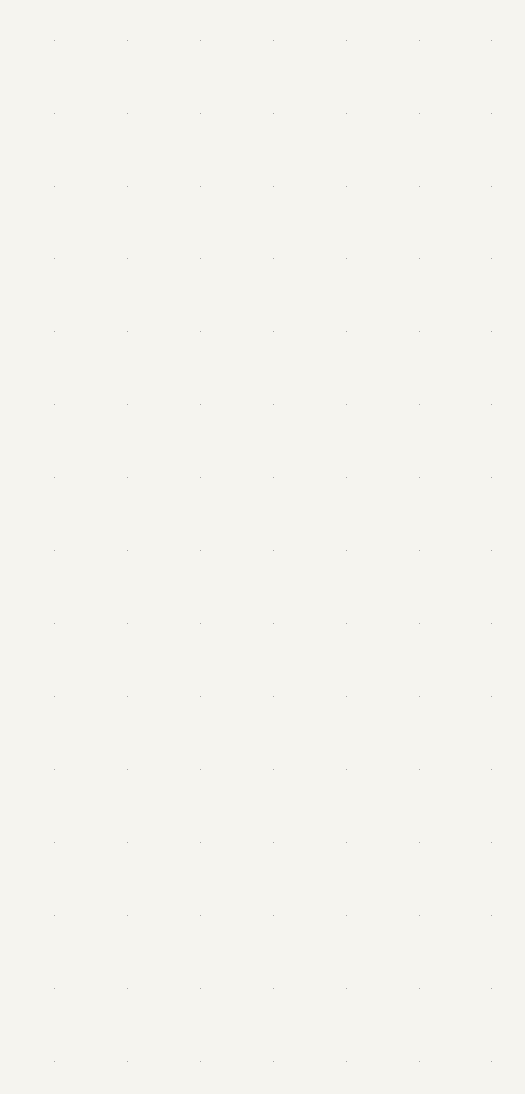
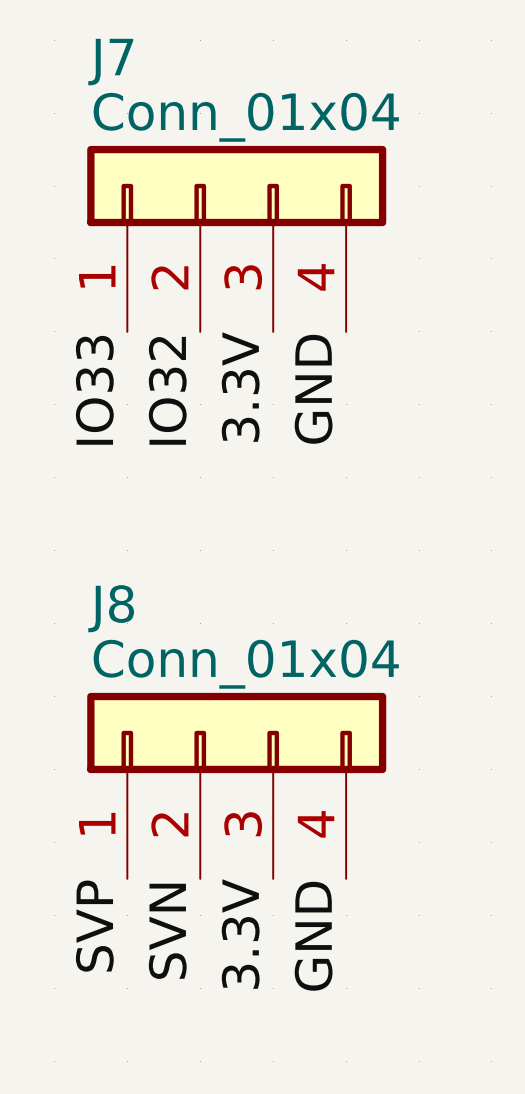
J7: none -> Conn_01x04 (236, 238)
label: none -> 3.3V (240, 387)
label: none -> GND (313, 389)
label: none -> IO33 (94, 390)
label: none -> IO32 (167, 390)
J8: none -> Conn_01x04 (236, 785)
label: none -> SVP (94, 926)
label: none -> SVN (167, 931)
label: none -> 3.3V (240, 934)
label: none -> GND (313, 936)

